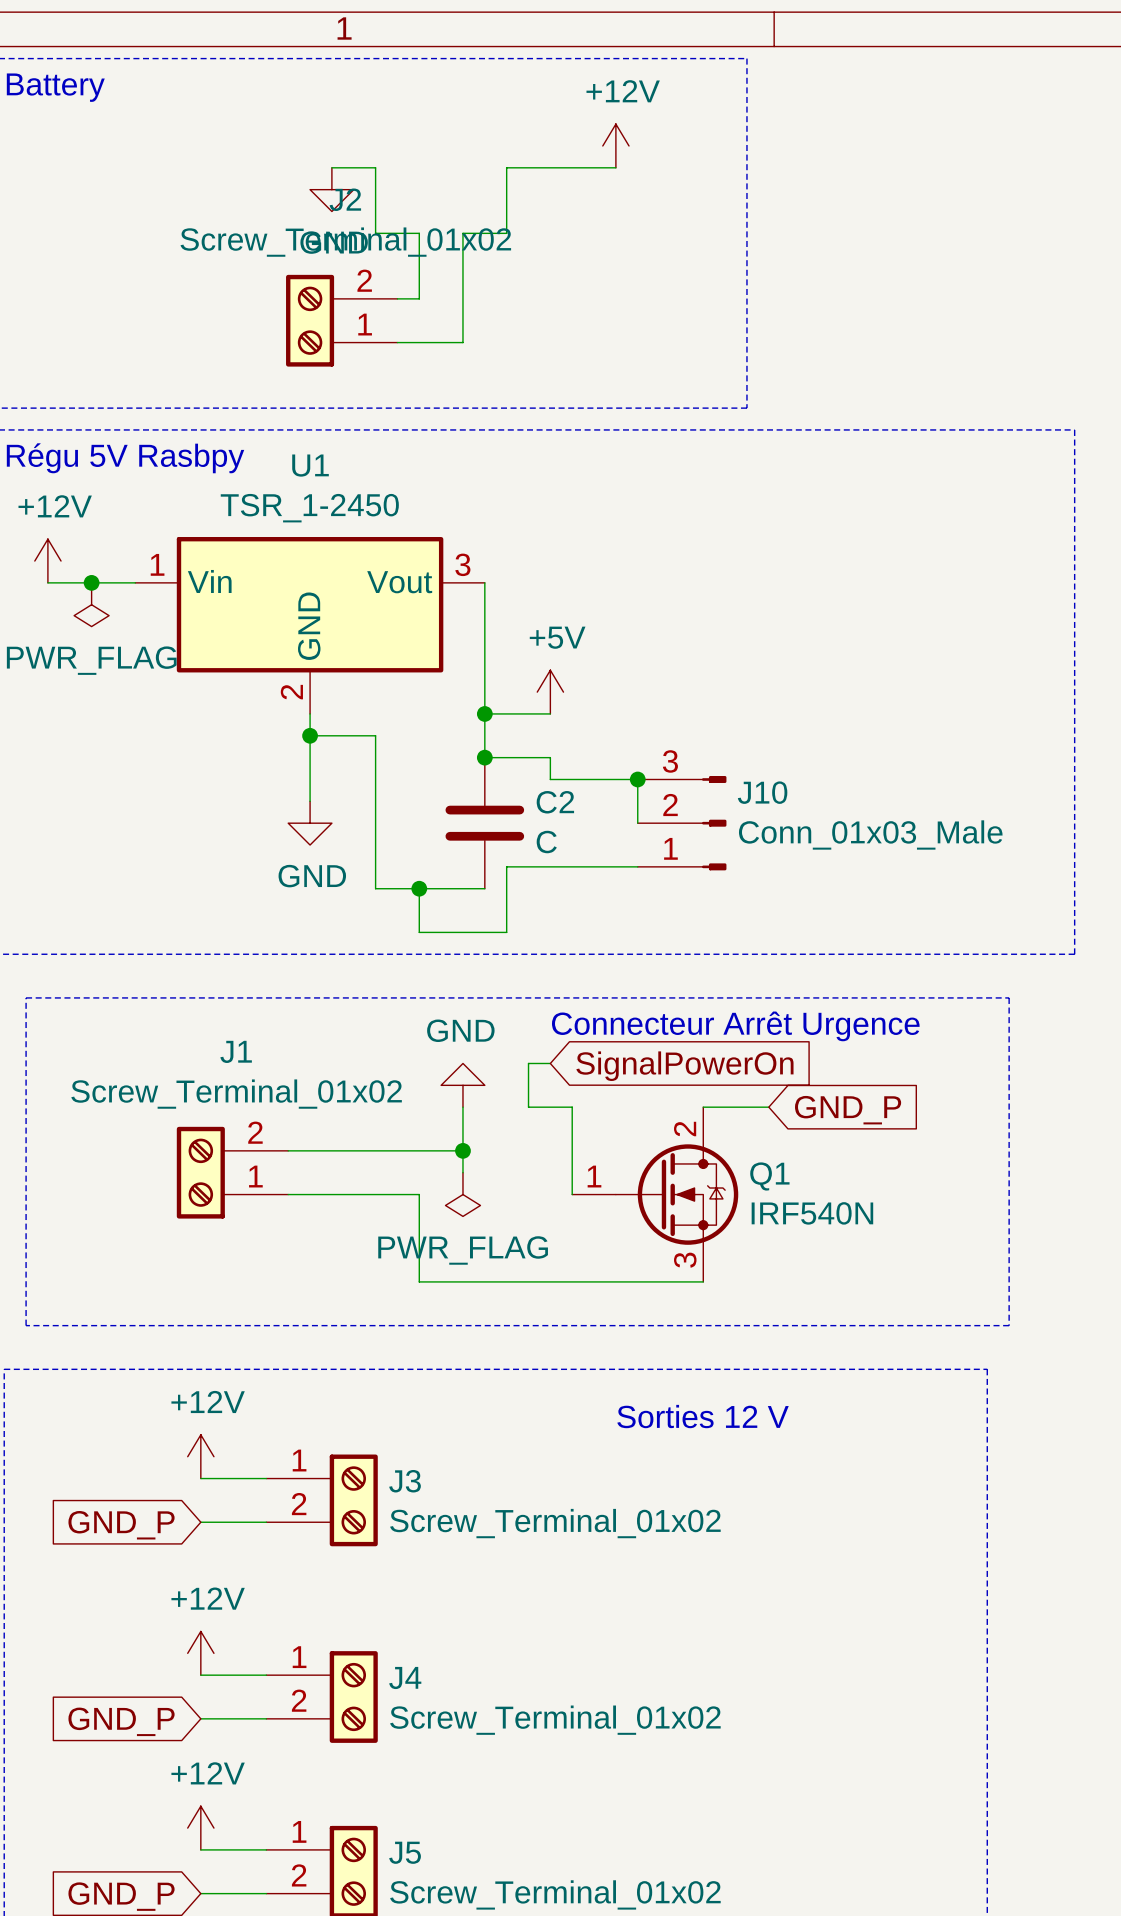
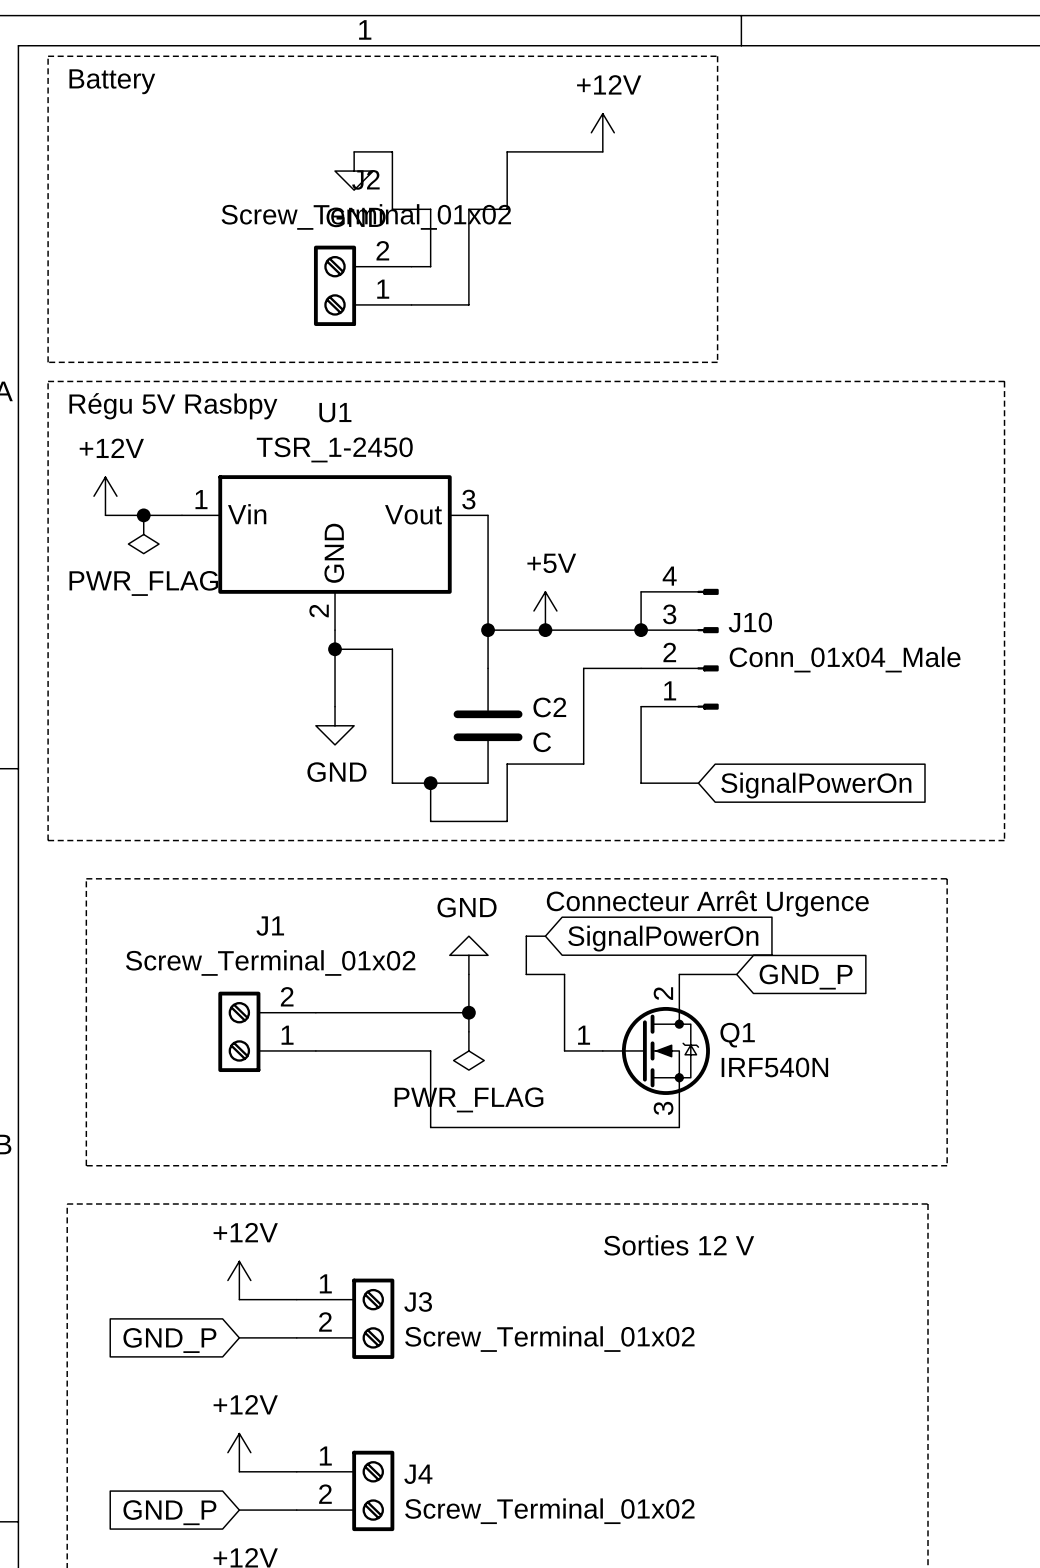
wire: none -> (641, 591) (641, 630) (545, 630)
junction: none -> (545, 630)
junction: none -> (641, 630)
wire: (484, 757) (550, 757) (550, 779) (637, 779) (637, 823) -> none
junction: (484, 757) -> none
J10 symbol: [637, 775, 727, 871] -> [641, 588, 719, 710]
junction: (637, 779) -> none
wire: none -> (641, 706) (641, 783) (698, 783)
J10 value: Conn_01x03_Male (870, 834) -> Conn_01x04_Male (845, 659)
wire: (594, 866) (637, 866) -> (583, 764) (583, 668) (641, 668)
global label: none -> SignalPowerOn (816, 785)

